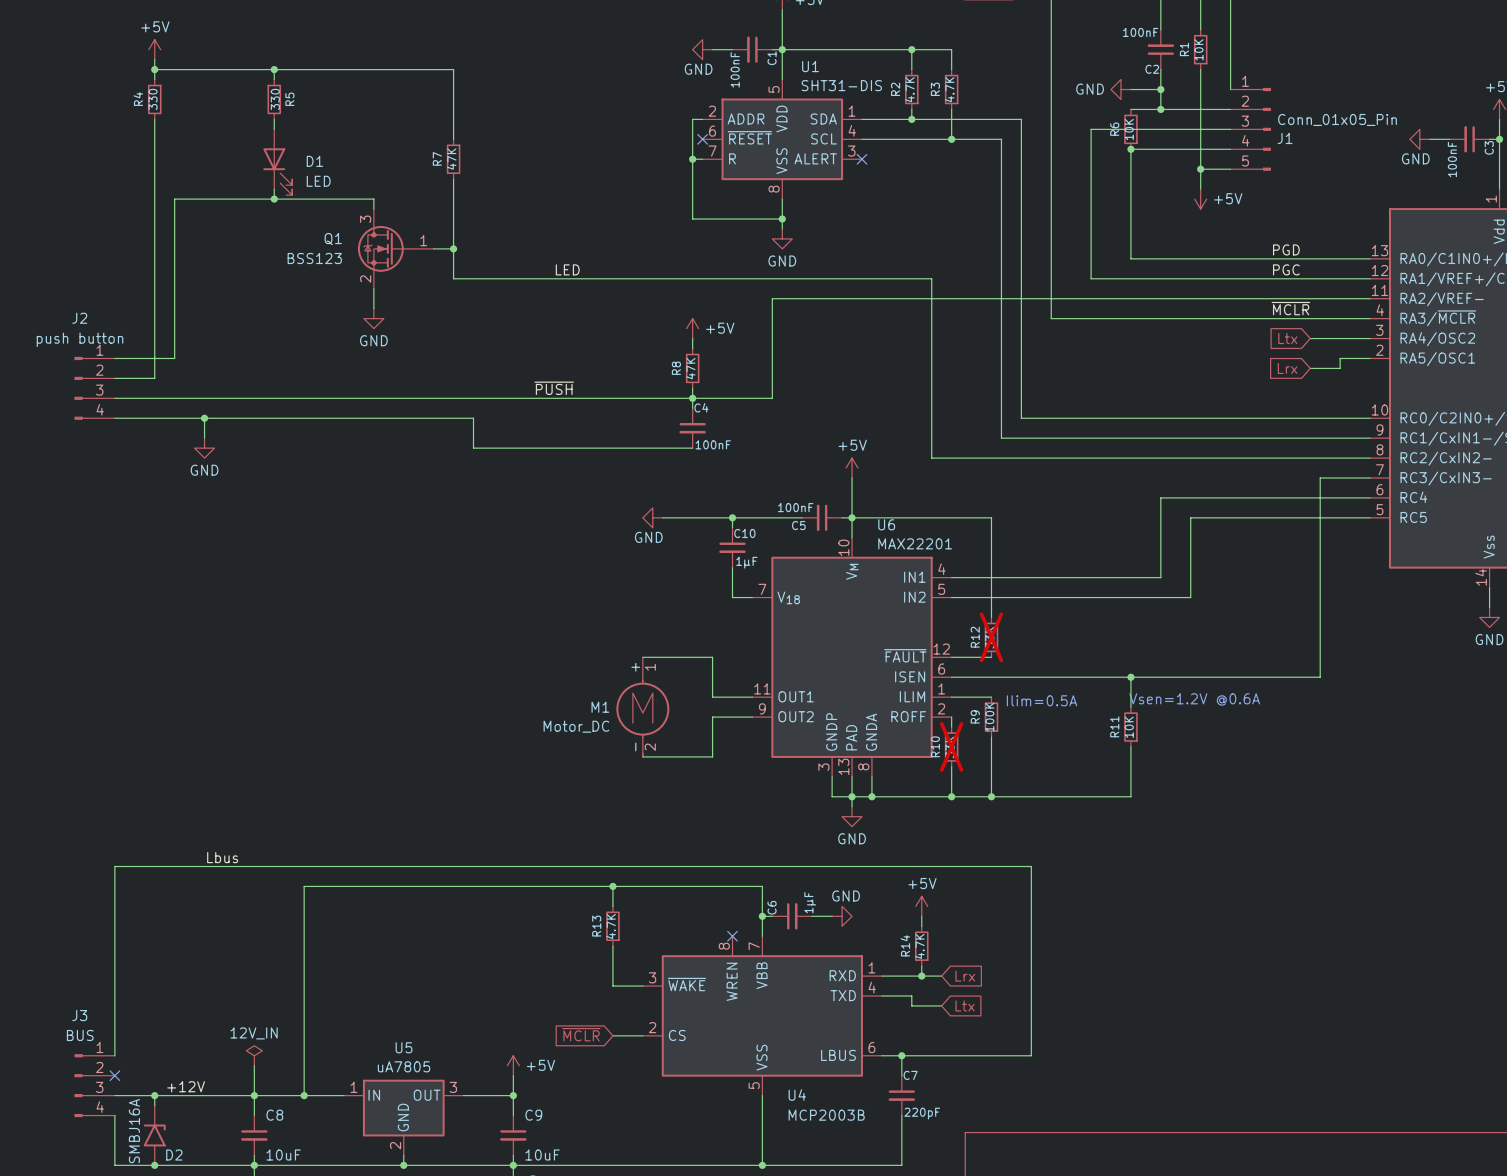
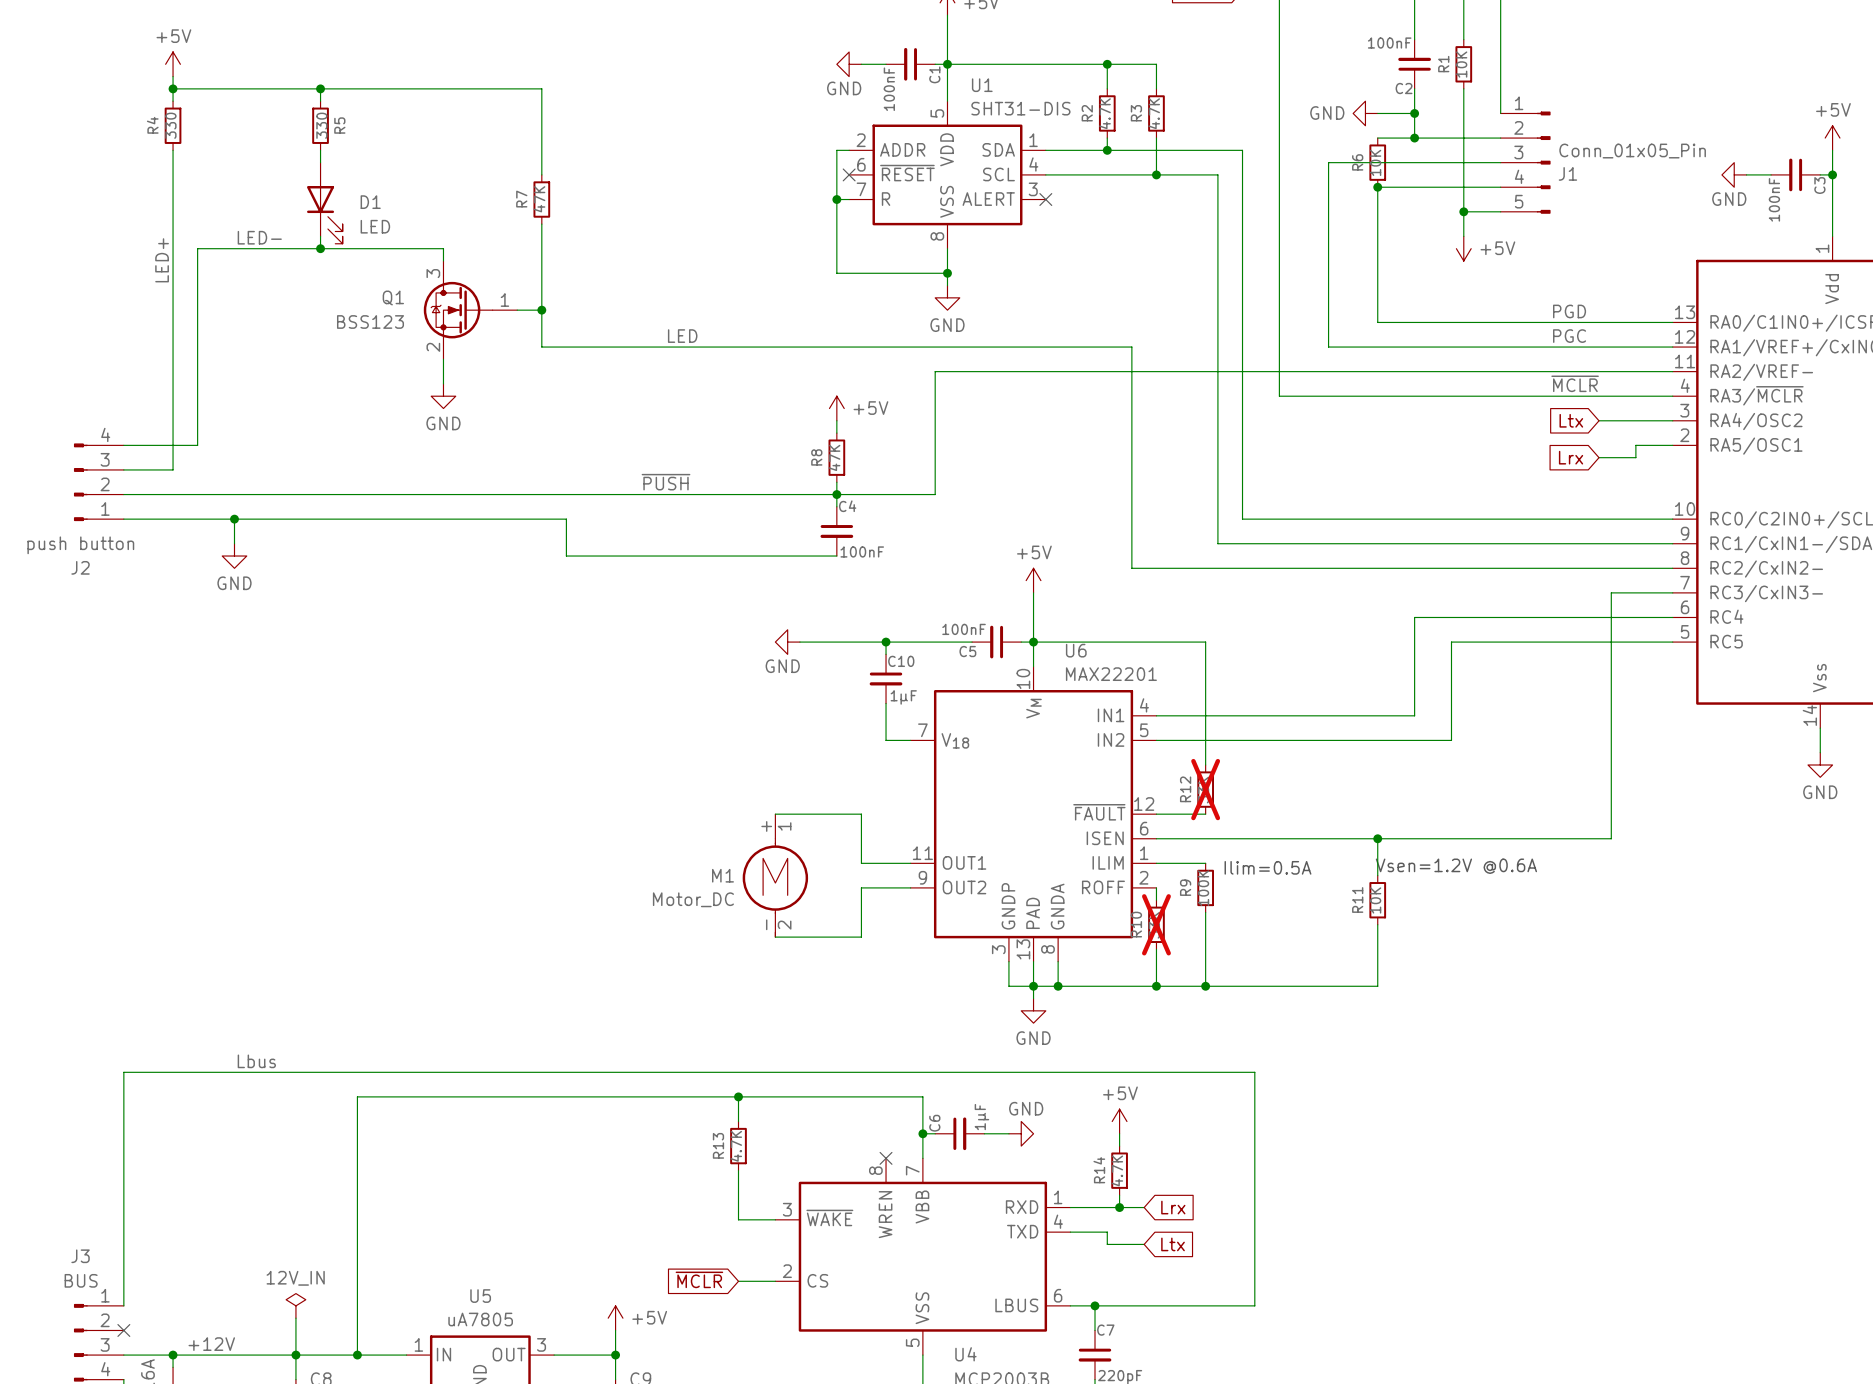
label: none -> LED- (259, 237)
label: none -> LED+ (162, 260)
J2 flip: as is (80, 388) -> up-down (80, 482)

